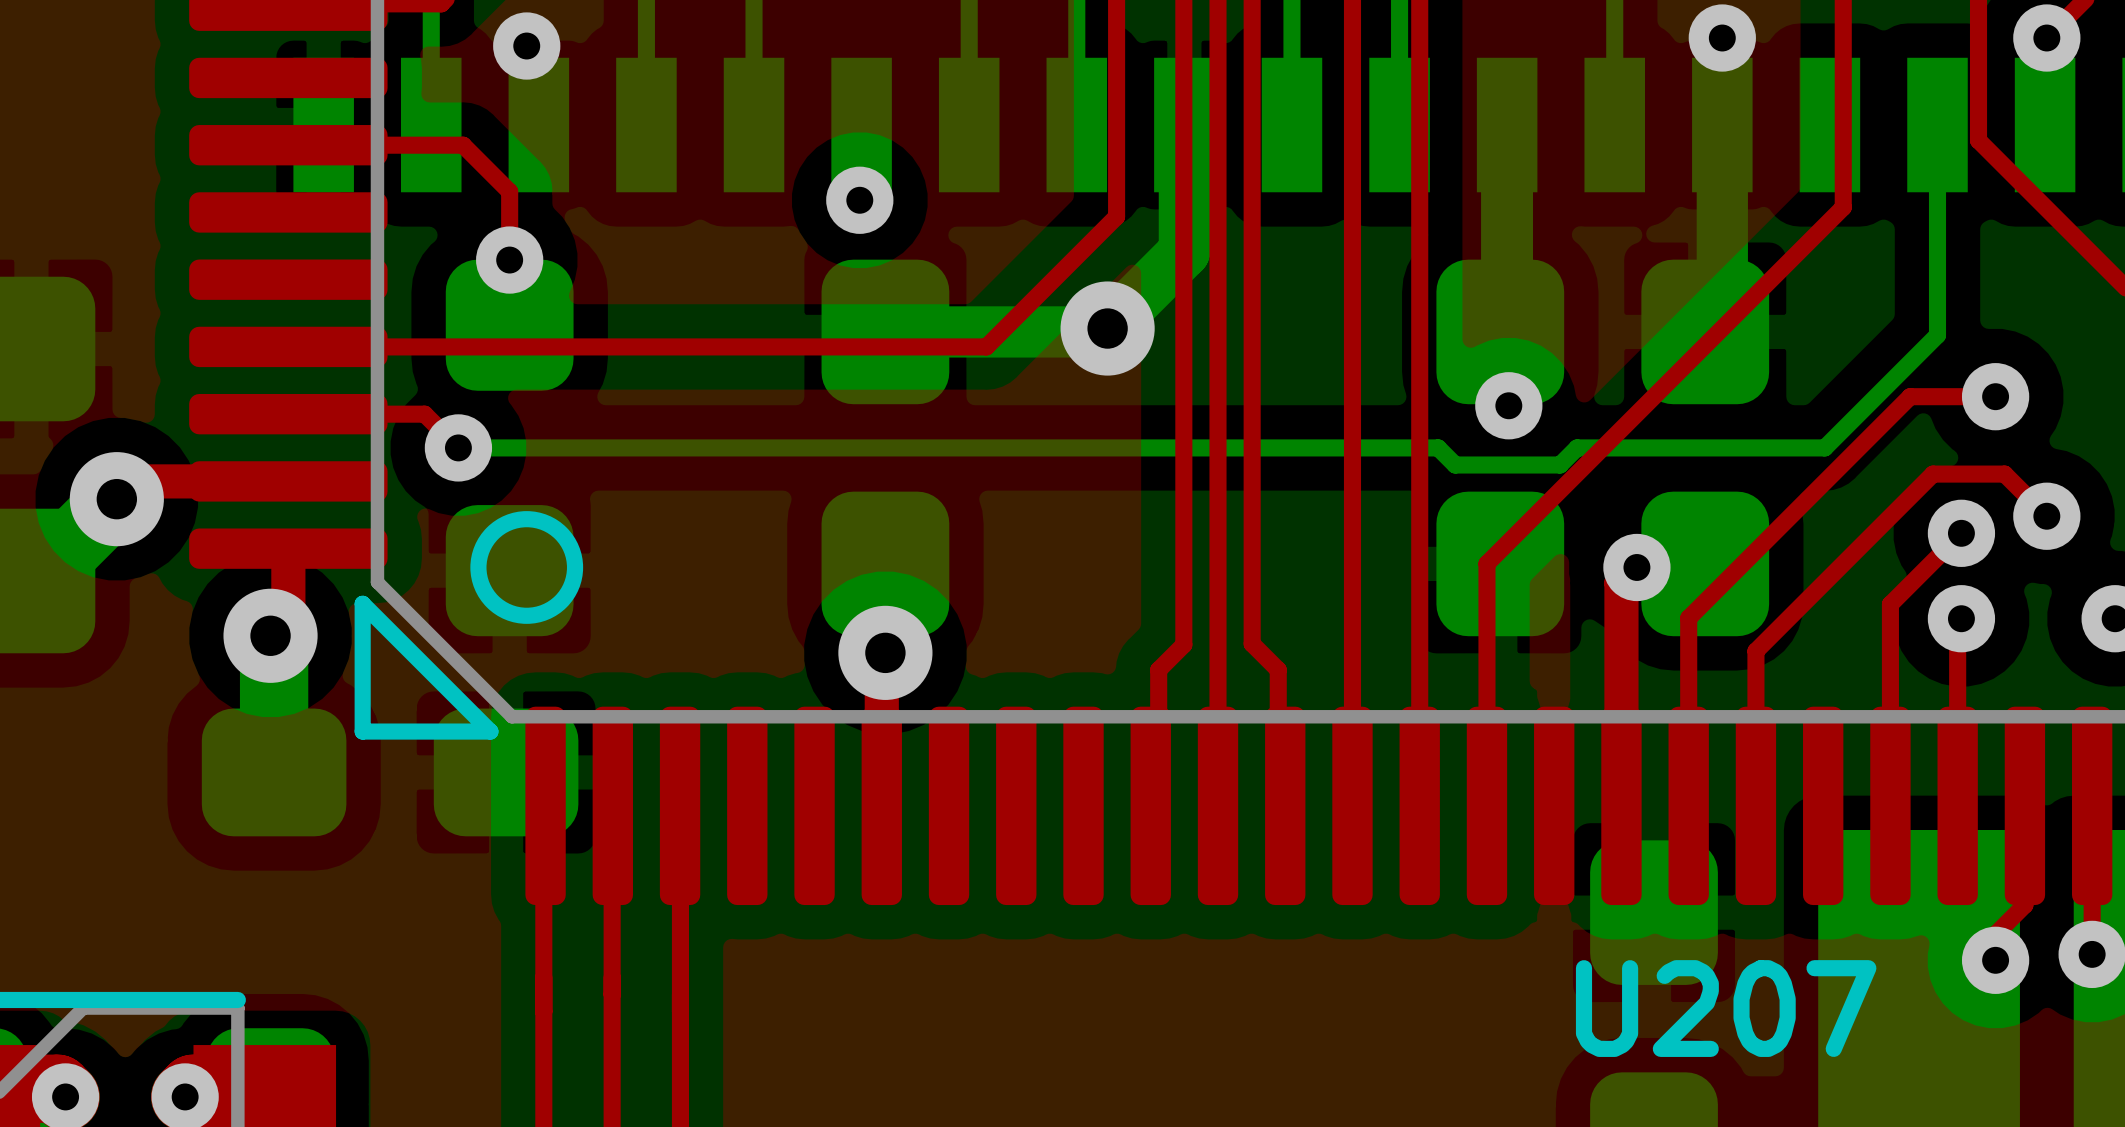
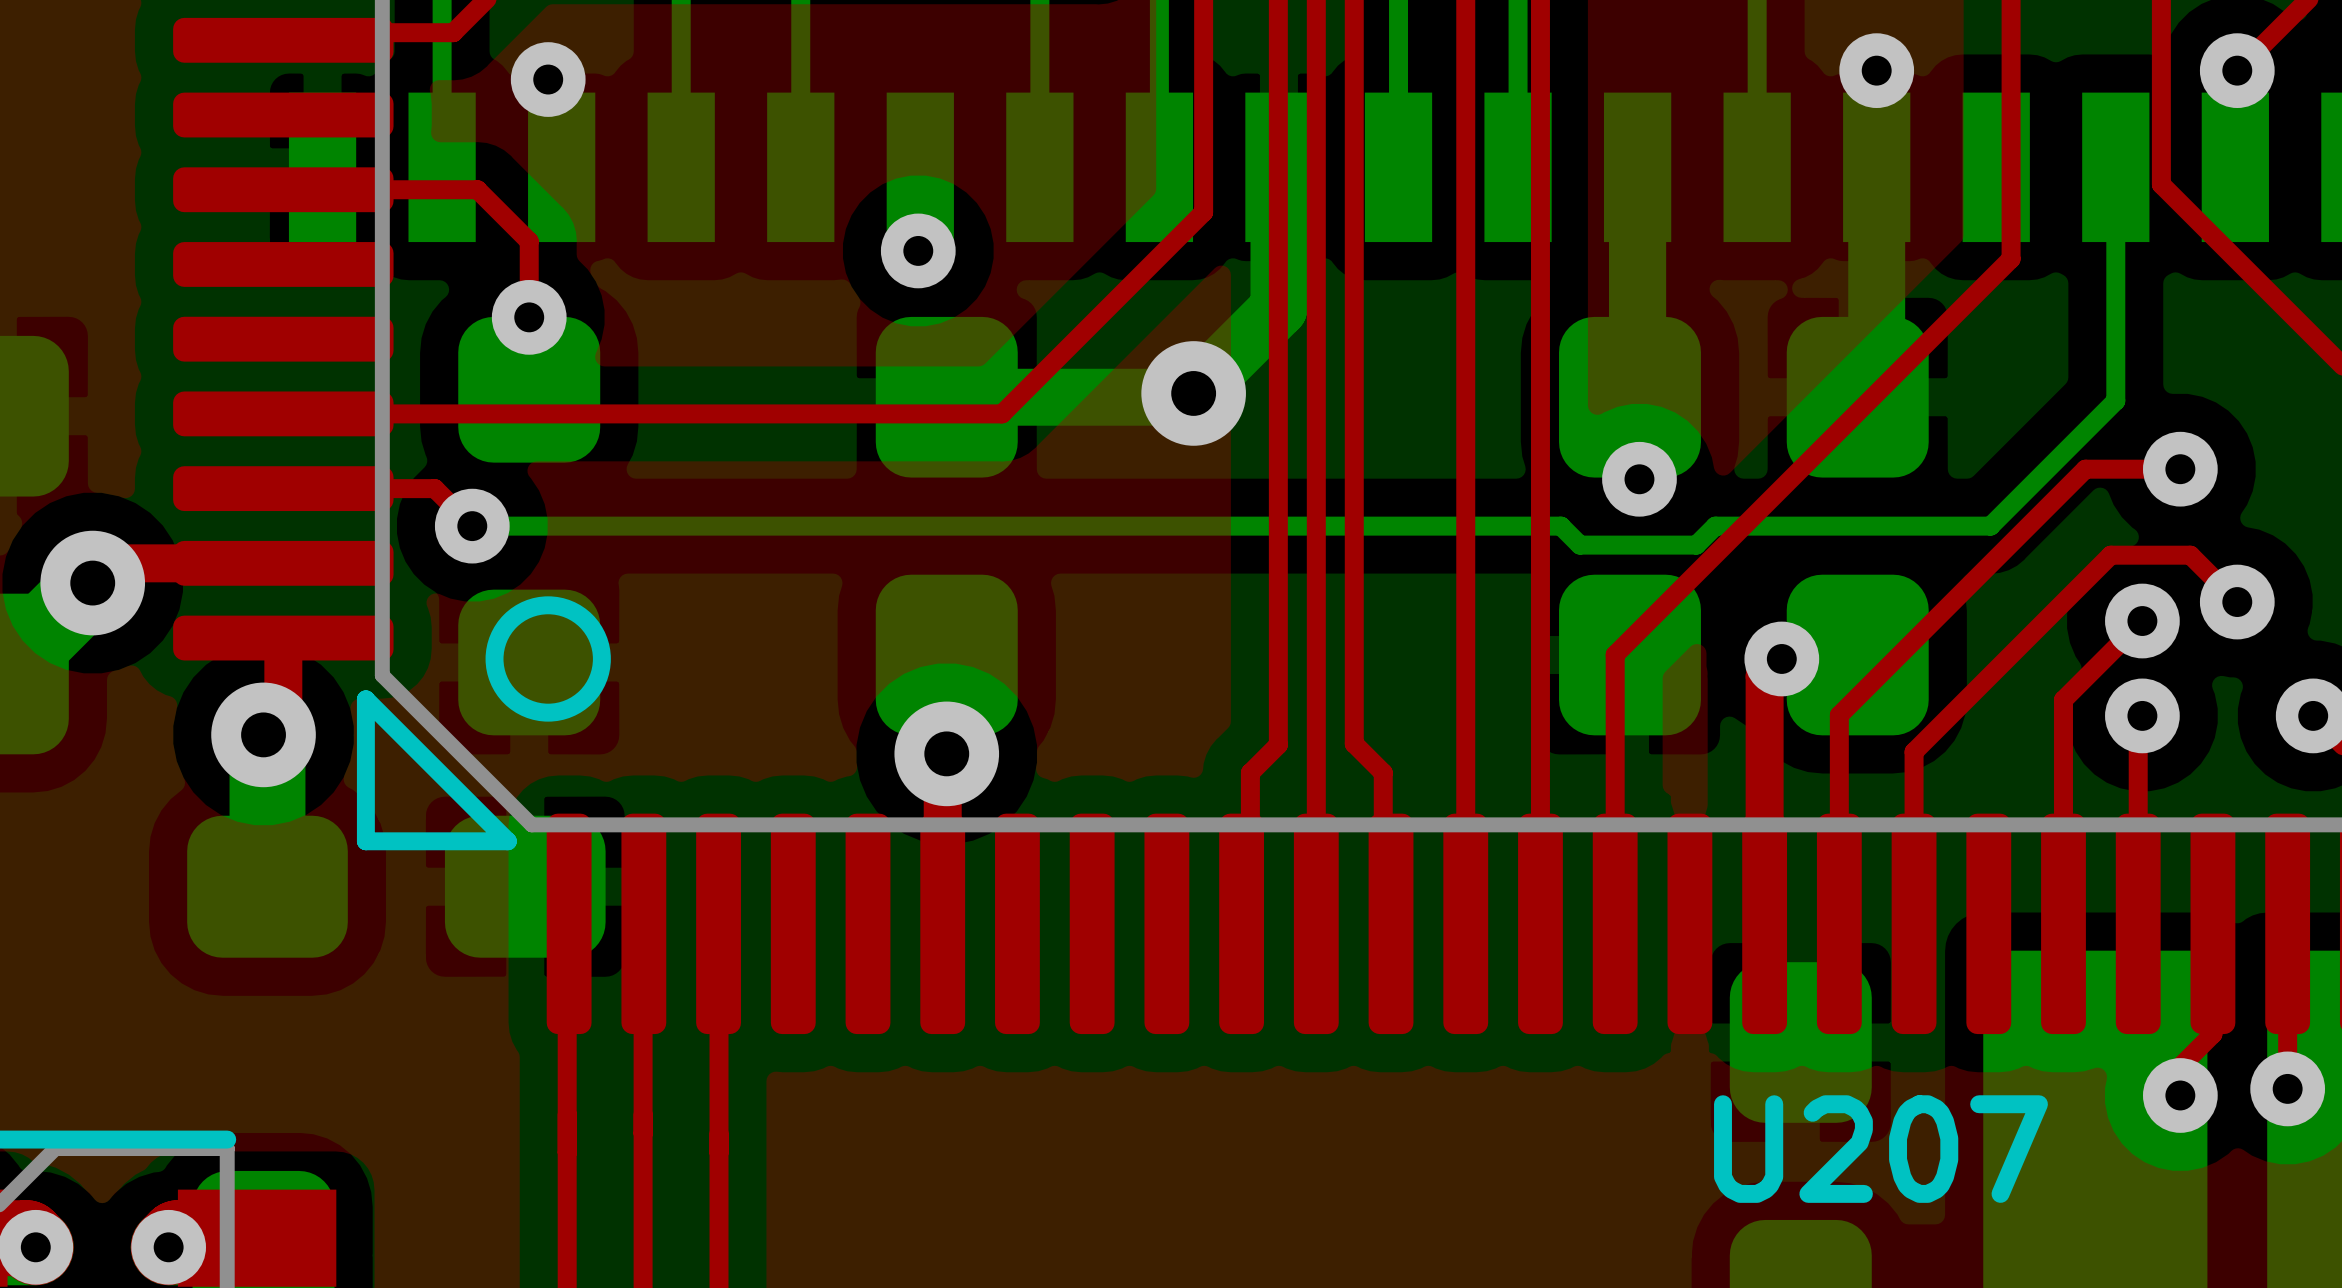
top track: (1116, 165) (1116, 216) (986, 346) (935, 346) -> (1203, 212) (1002, 413)

